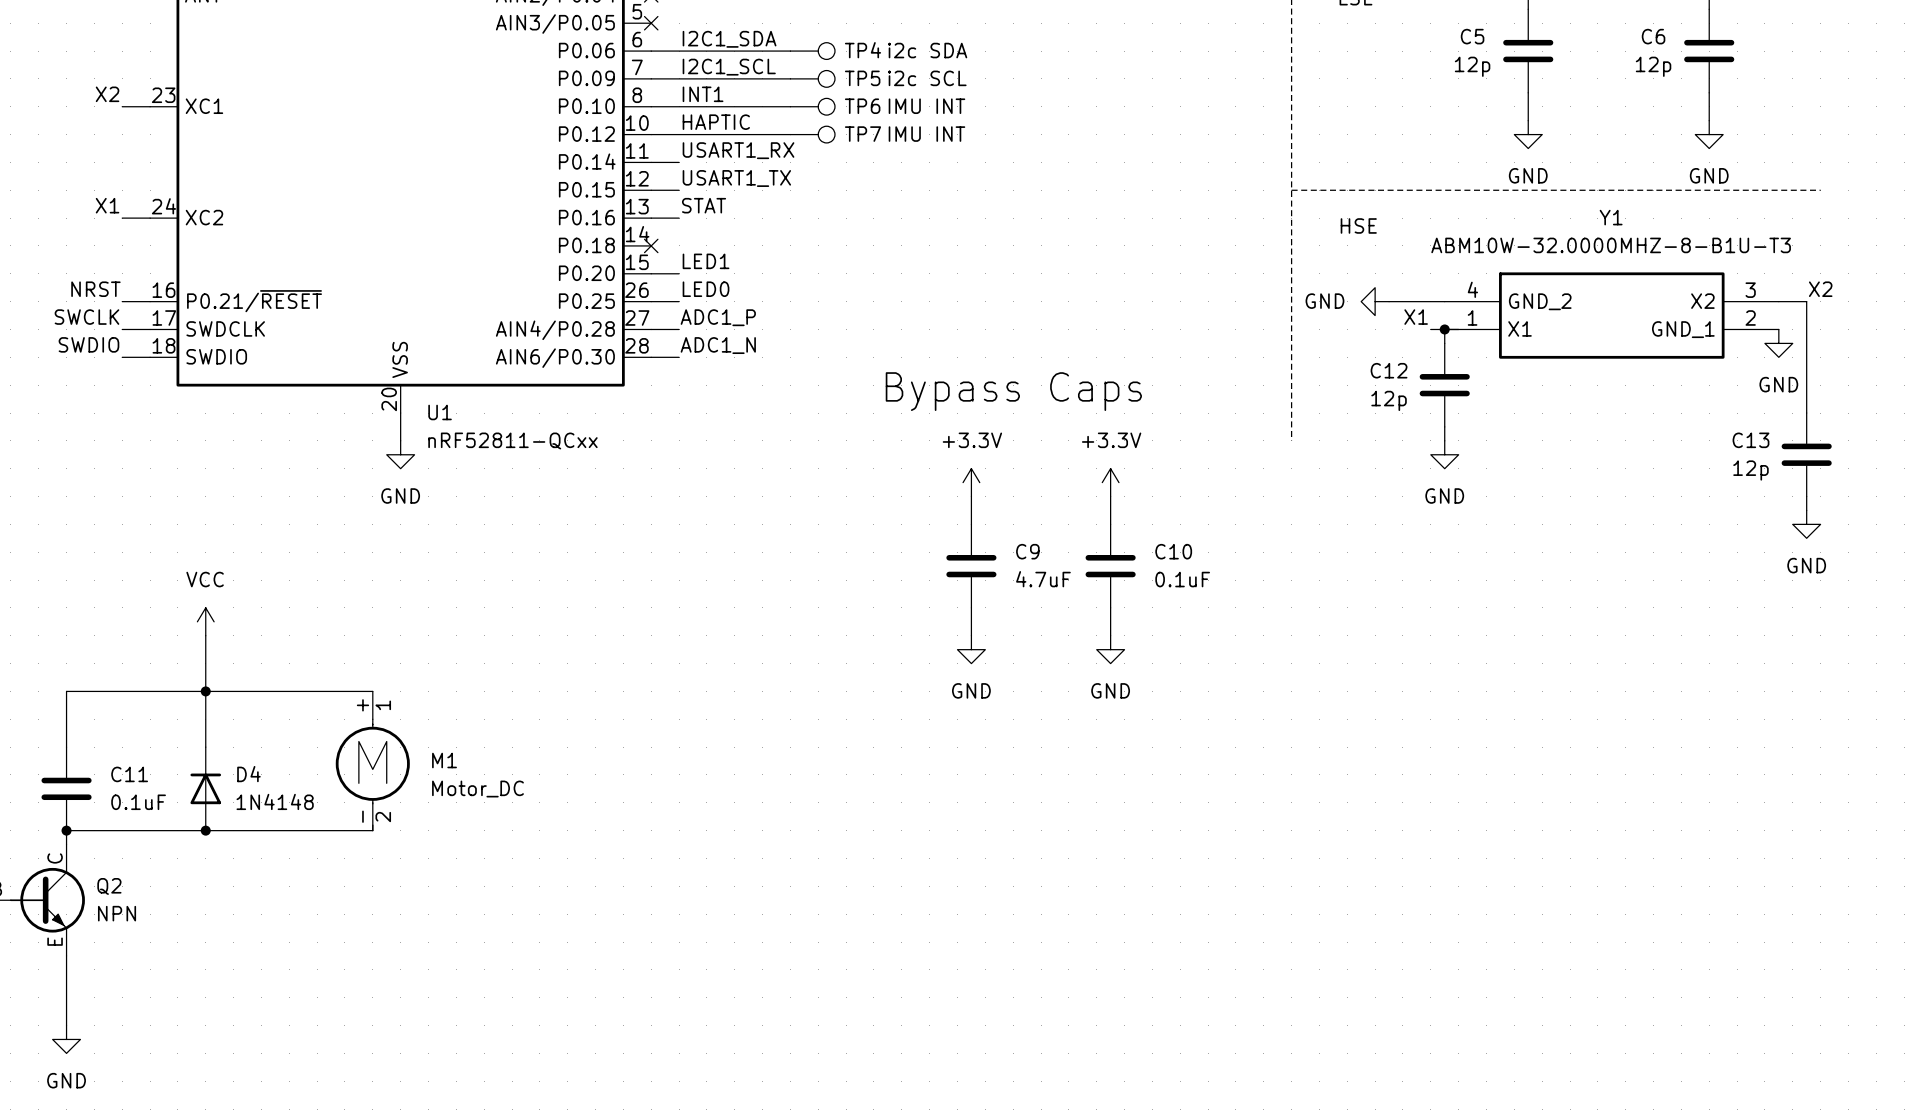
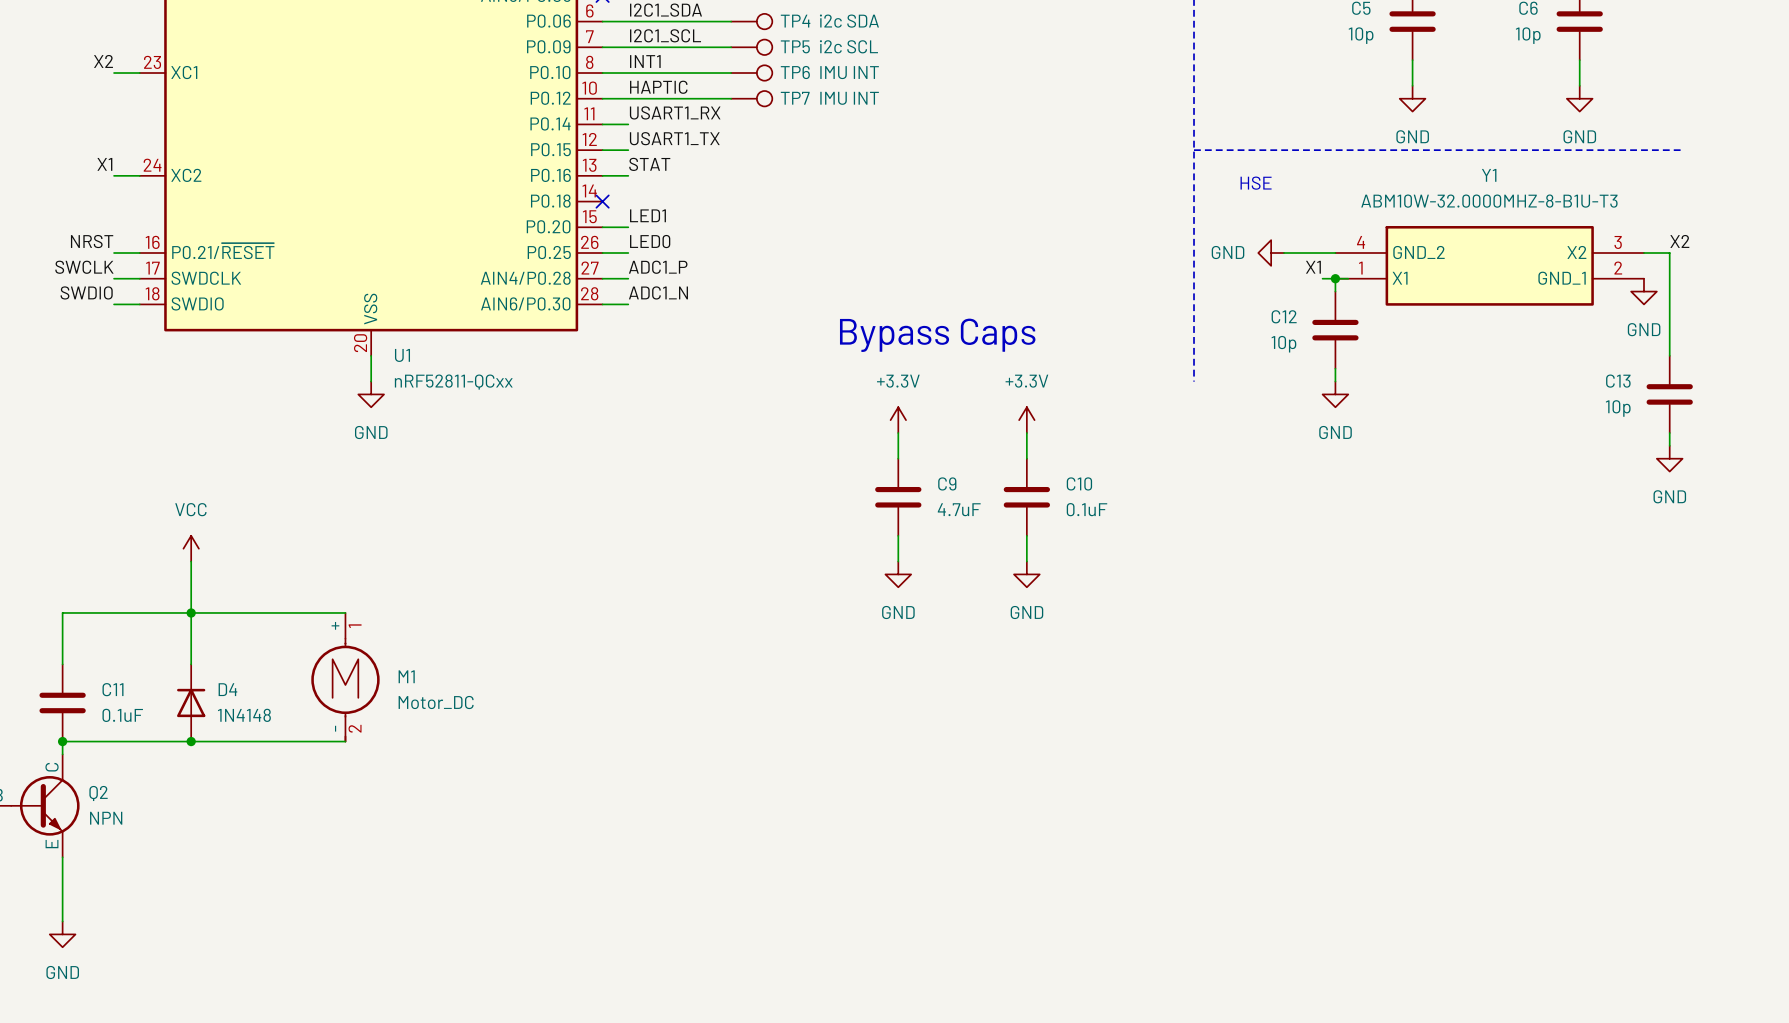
C5 value: 12p (1472, 66) -> 10p (1361, 35)
C6 value: 12p (1653, 66) -> 10p (1528, 35)
C12 value: 12p (1389, 400) -> 10p (1283, 344)
C13 value: 12p (1750, 470) -> 10p (1618, 408)

